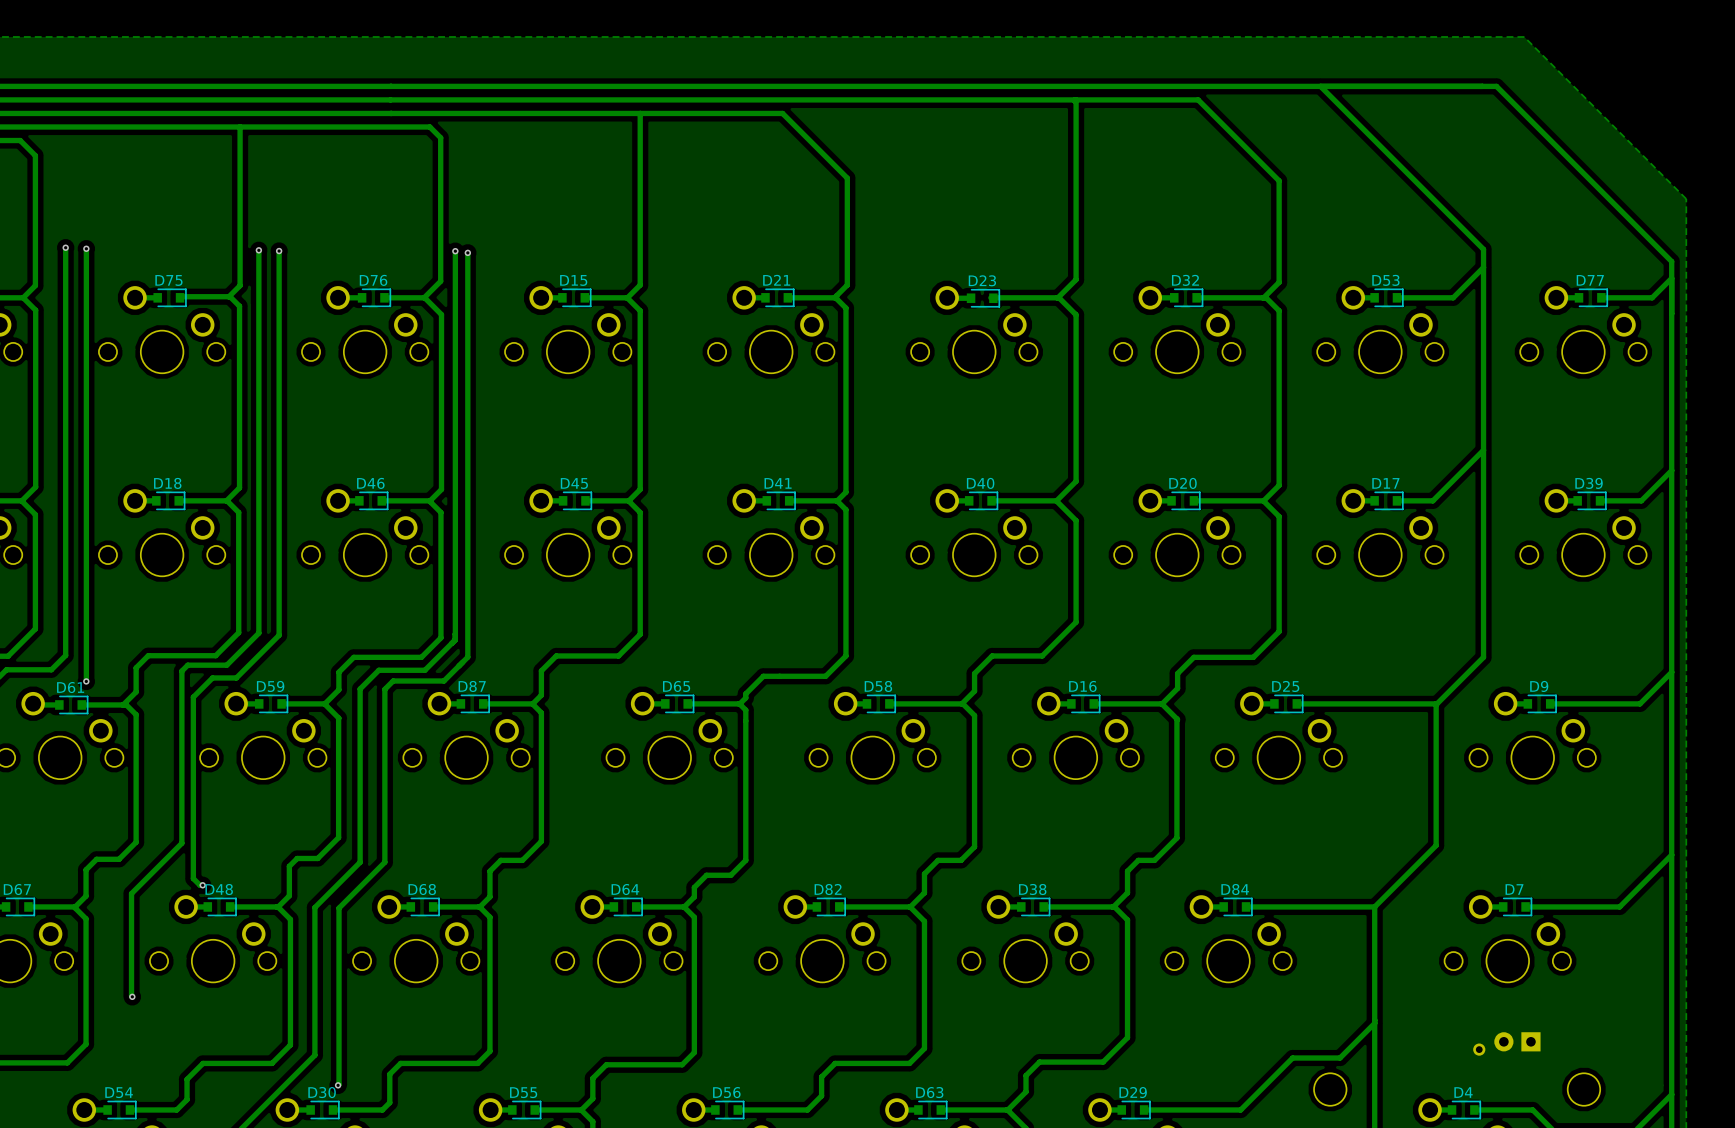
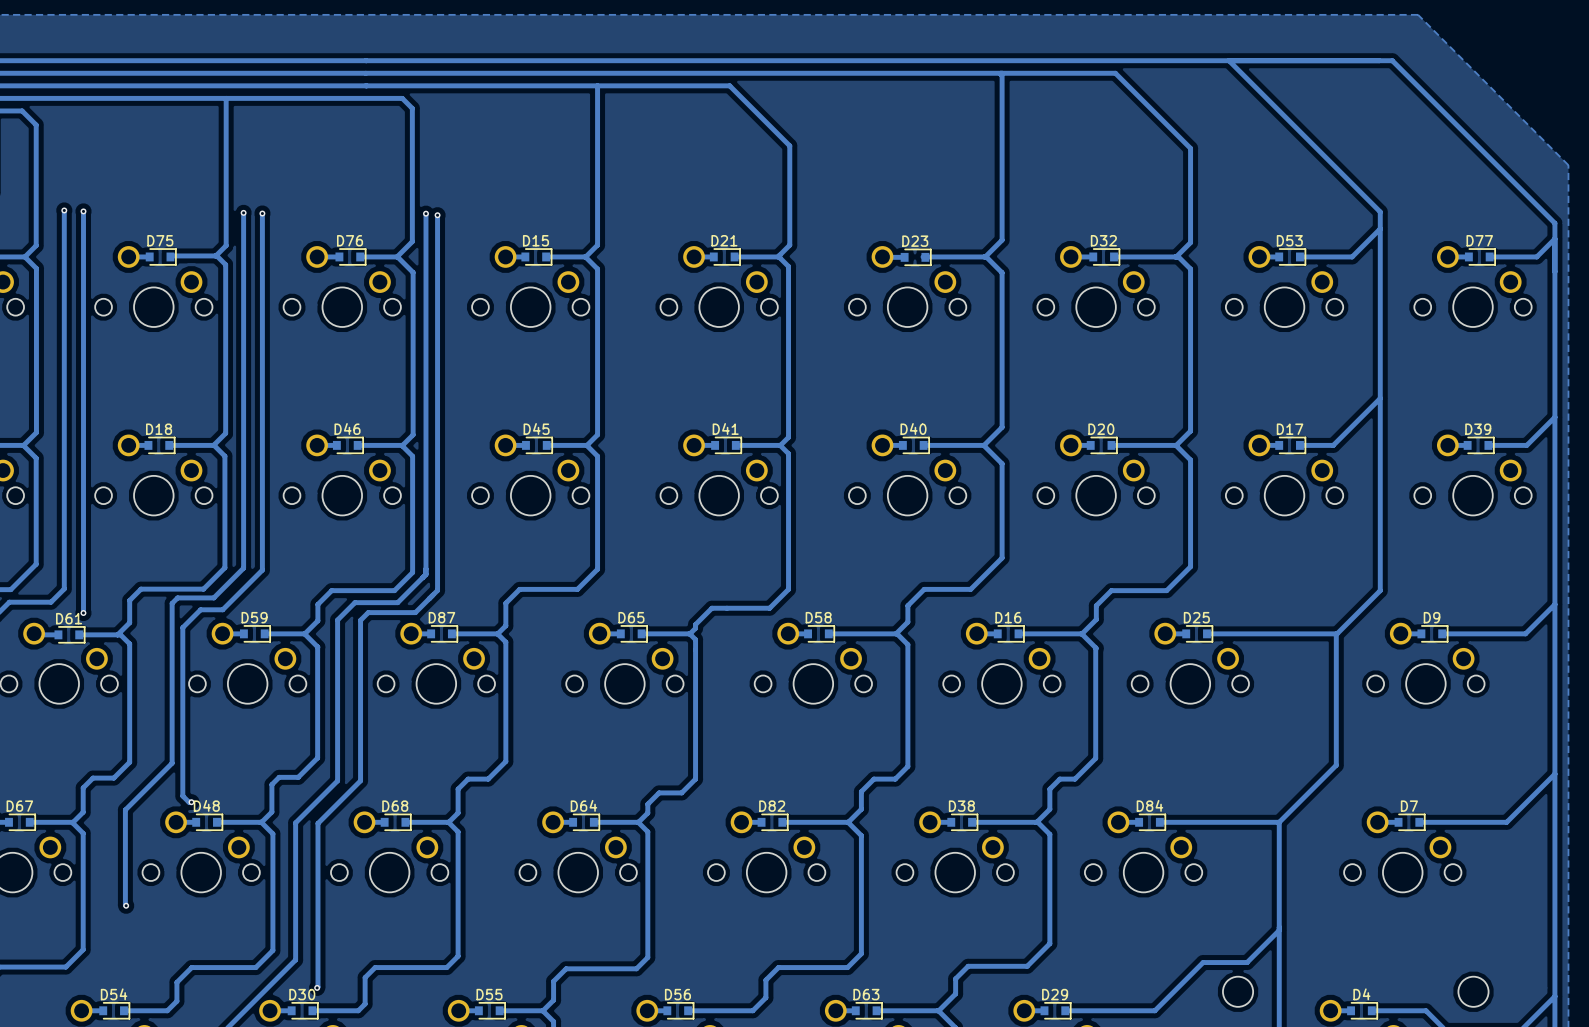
part: (1517, 1041) -> none
part: (1479, 1049) -> none

